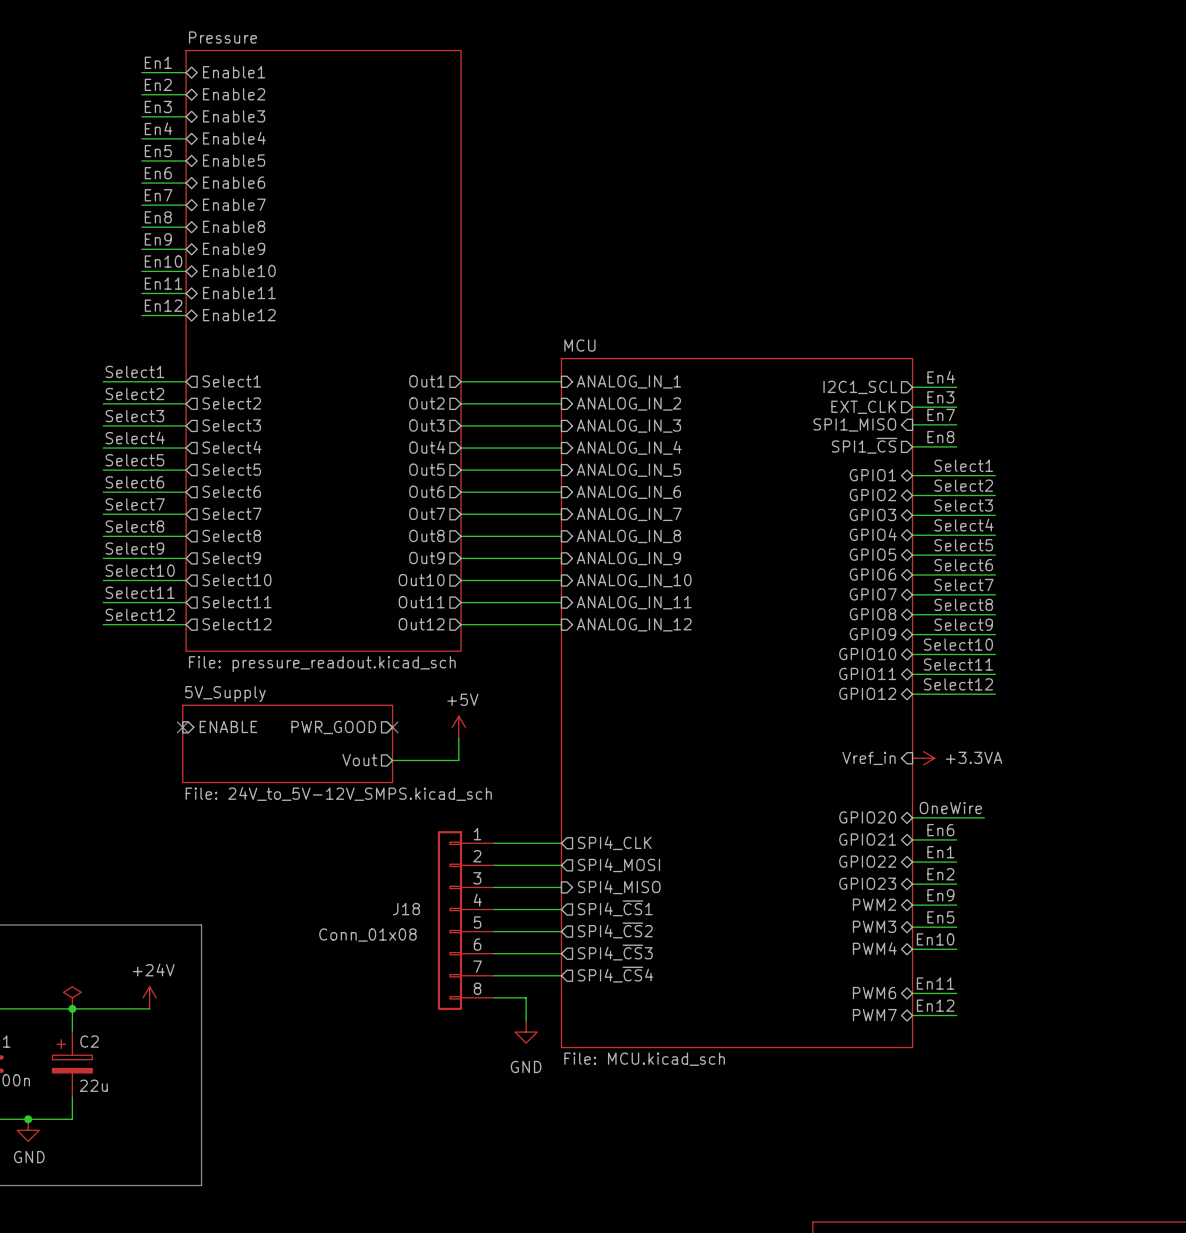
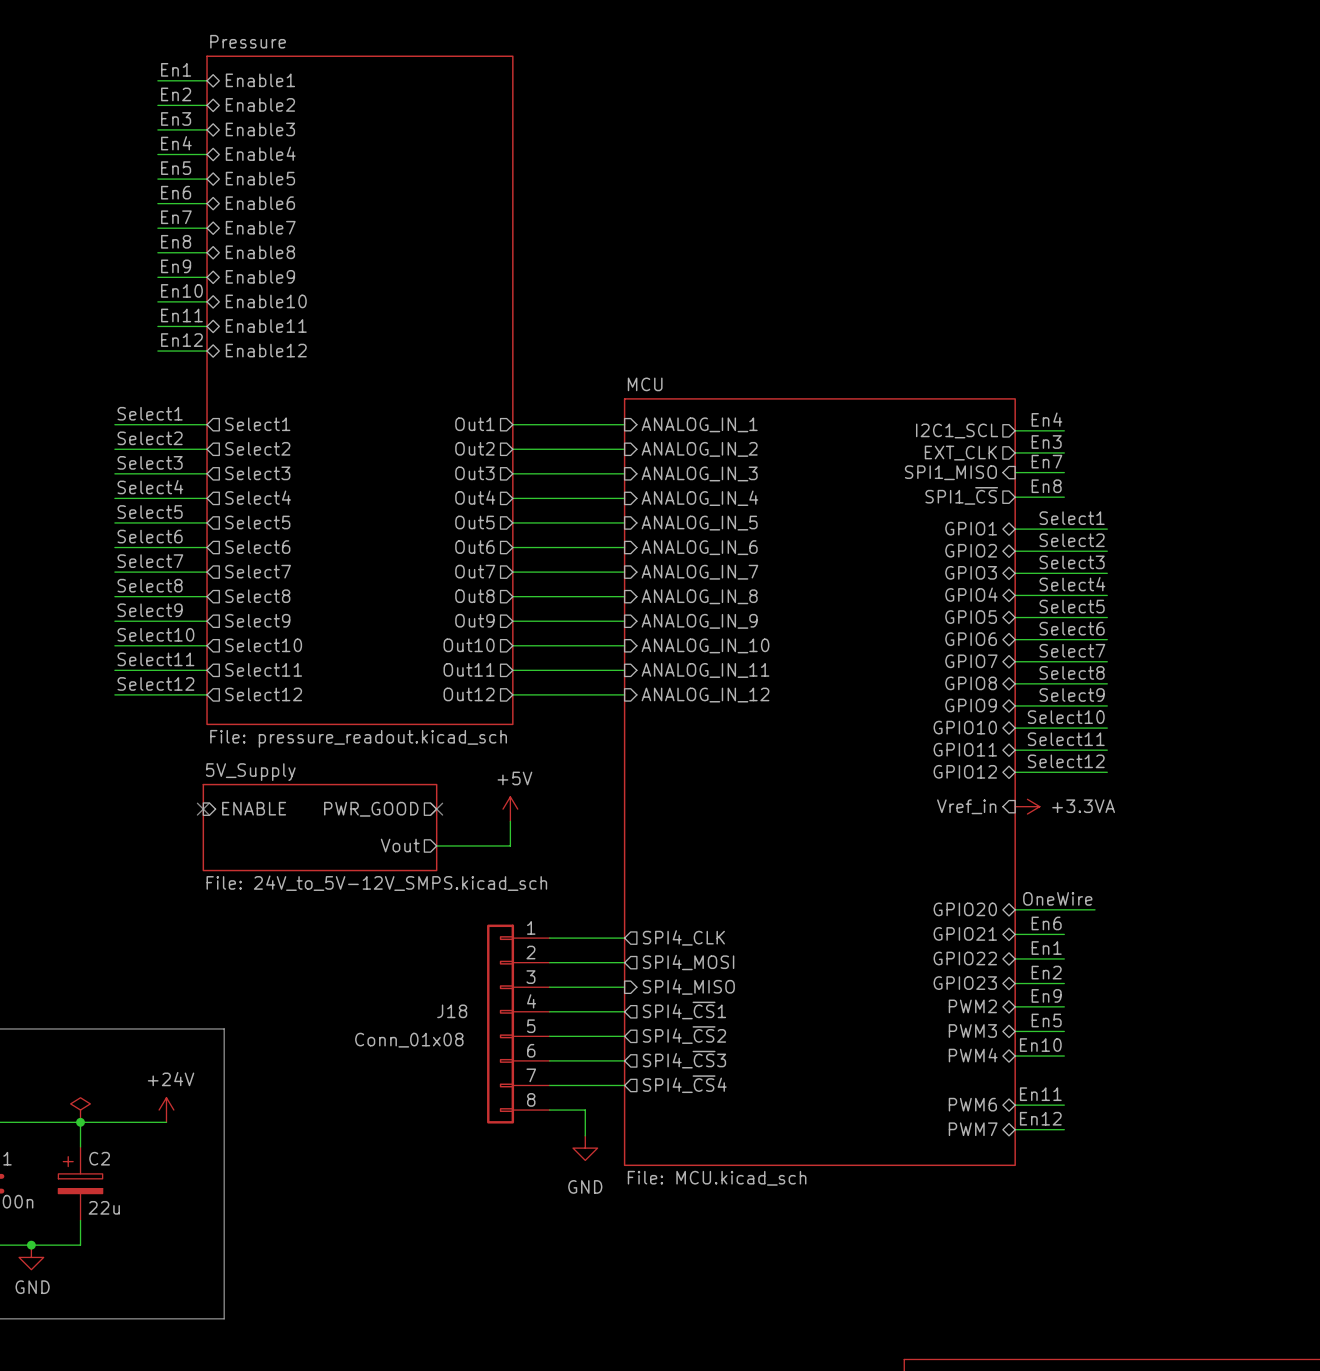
sheet pin position: Vref_in (869, 758) -> Vref_in (966, 806)
power symbol position: +3.3VA (923, 758) -> +3.3VA (1027, 806)

